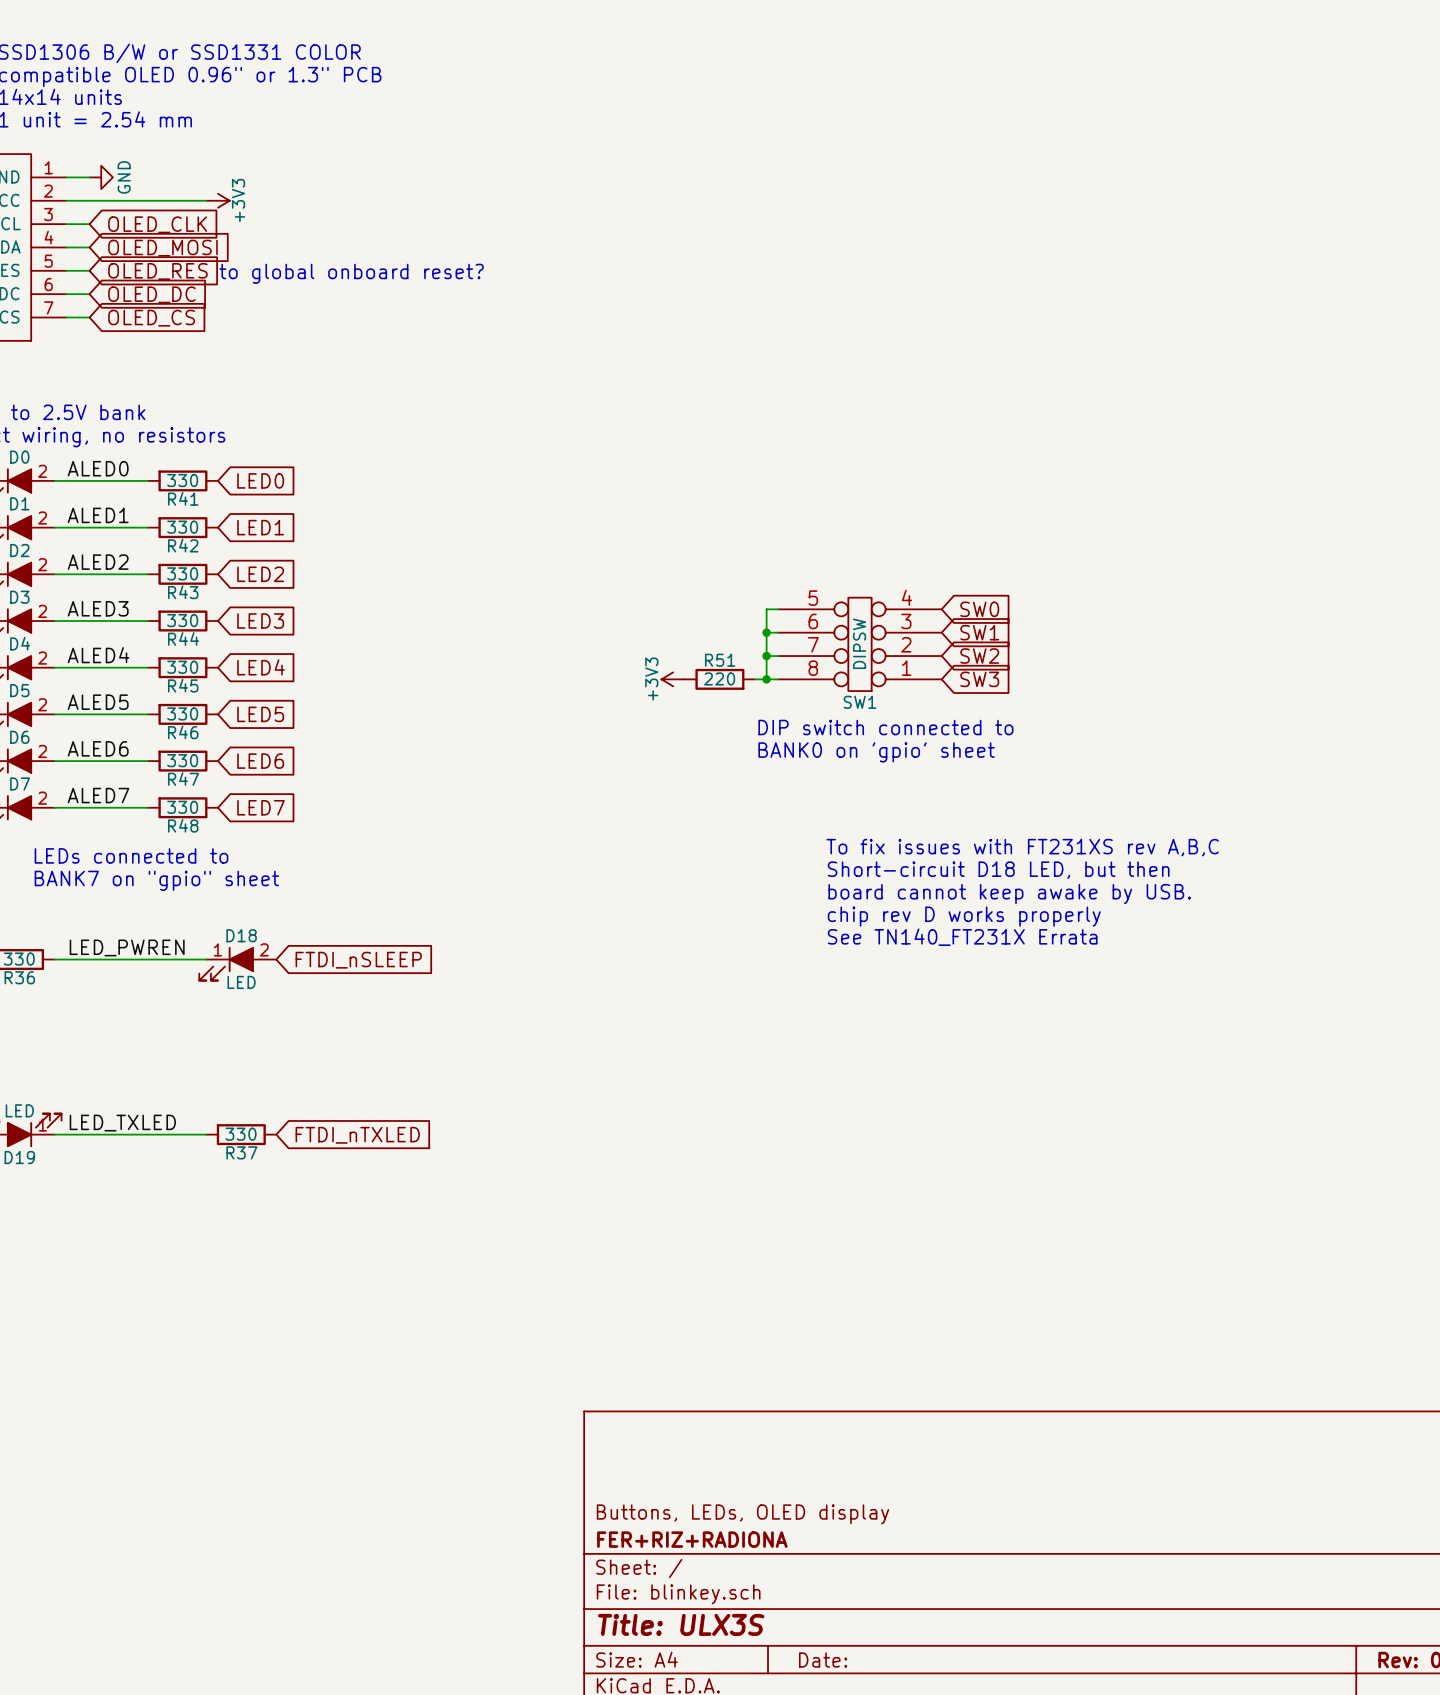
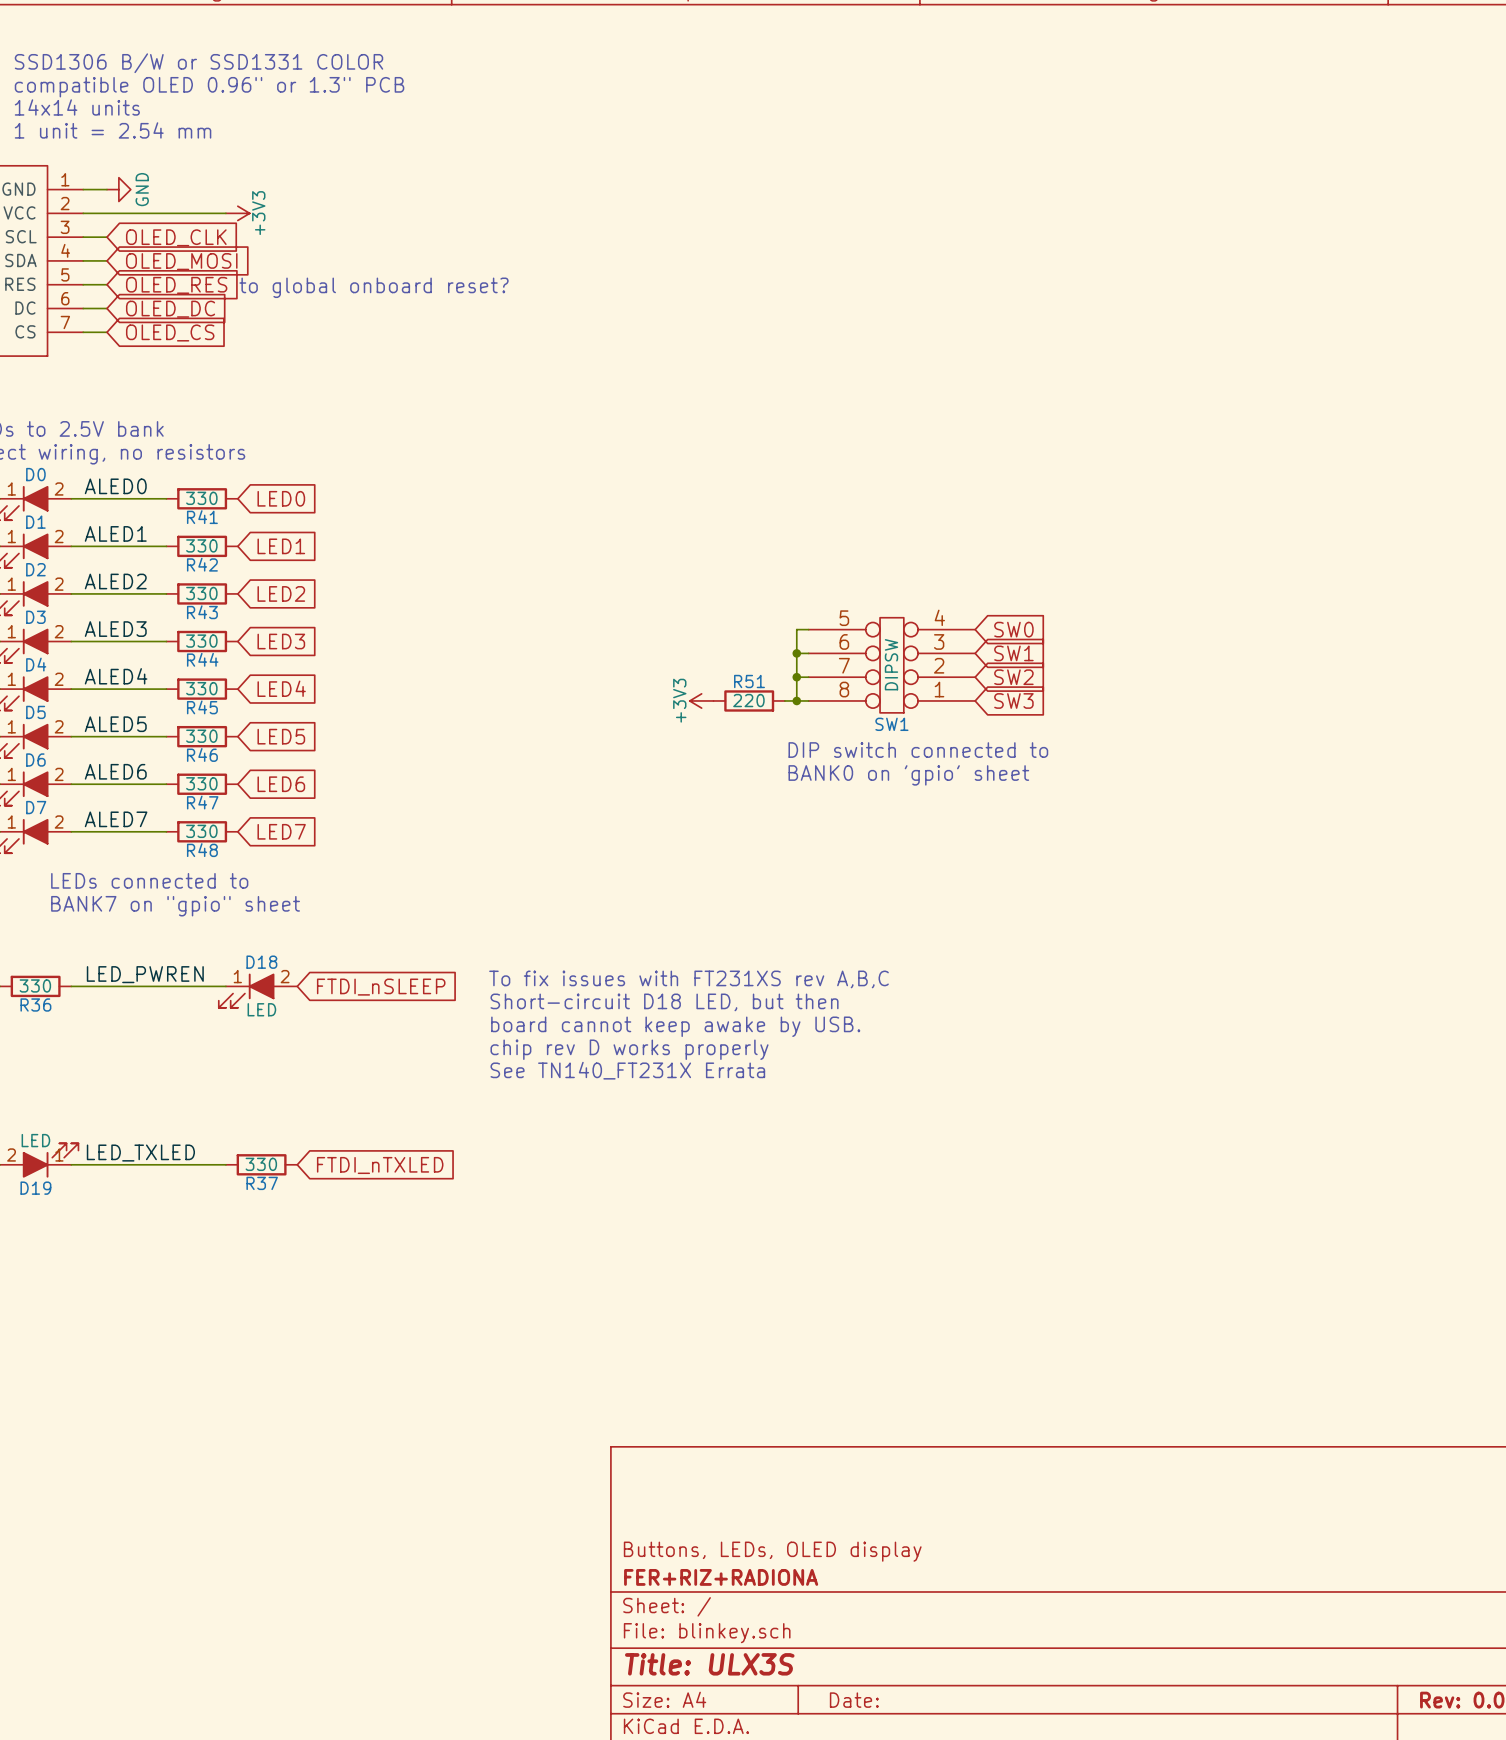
text: To fix issues with FT231XS rev A,B,C (1022, 847) -> none
text: Short-circuit D18 LED, but then (998, 870) -> none
text: board cannot keep awake by USB. (1009, 894) -> none
text: chip rev D works properly (964, 916) -> none
text: See TN140_FT231X Errata (962, 937) -> none
text: none -> To fix issues with FT231XS rev A,B,C (688, 979)
text: none -> Short-circuit D18 LED, but then (664, 1002)
text: none -> board cannot keep awake by USB. (675, 1026)
text: none -> chip rev D works properly (629, 1049)
text: none -> See TN140_FT231X Errata (627, 1070)

